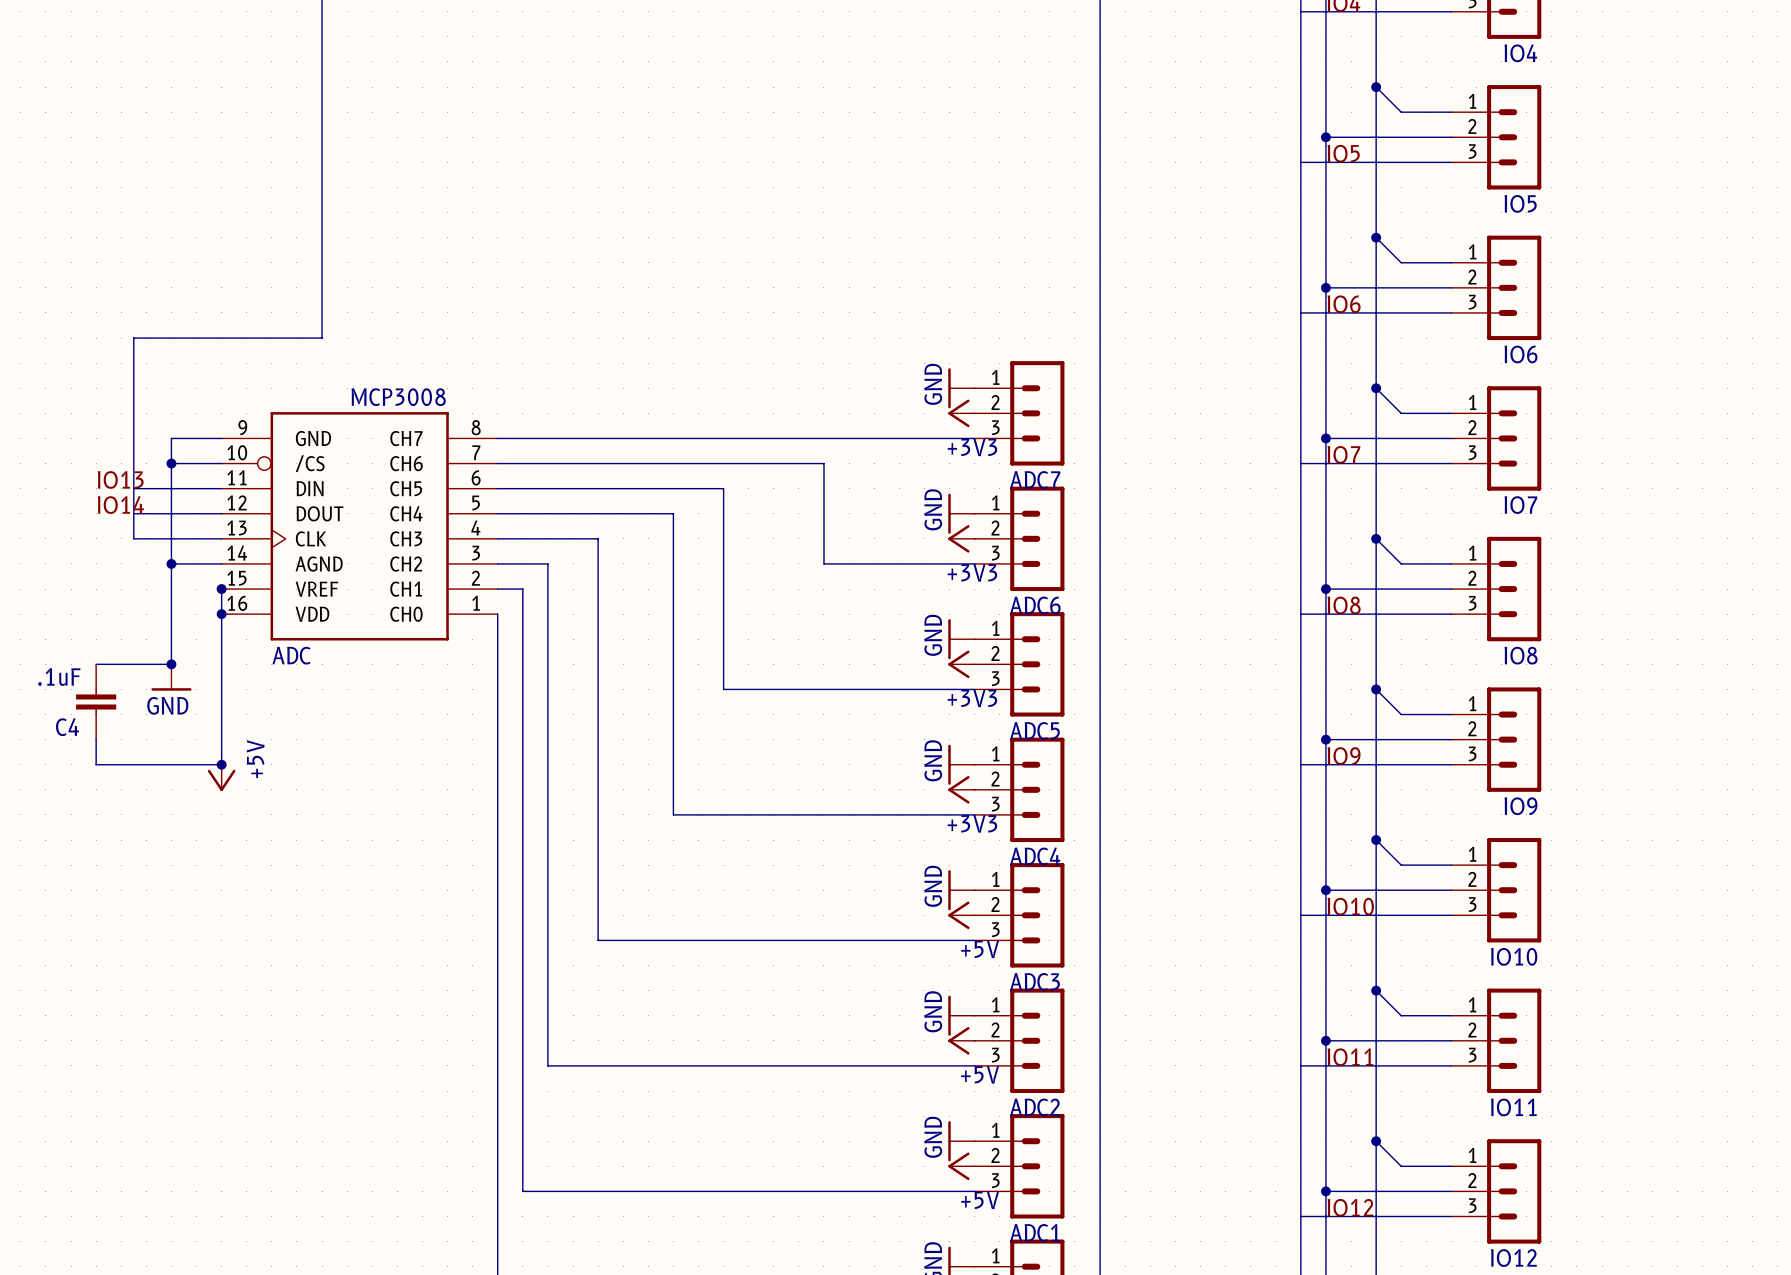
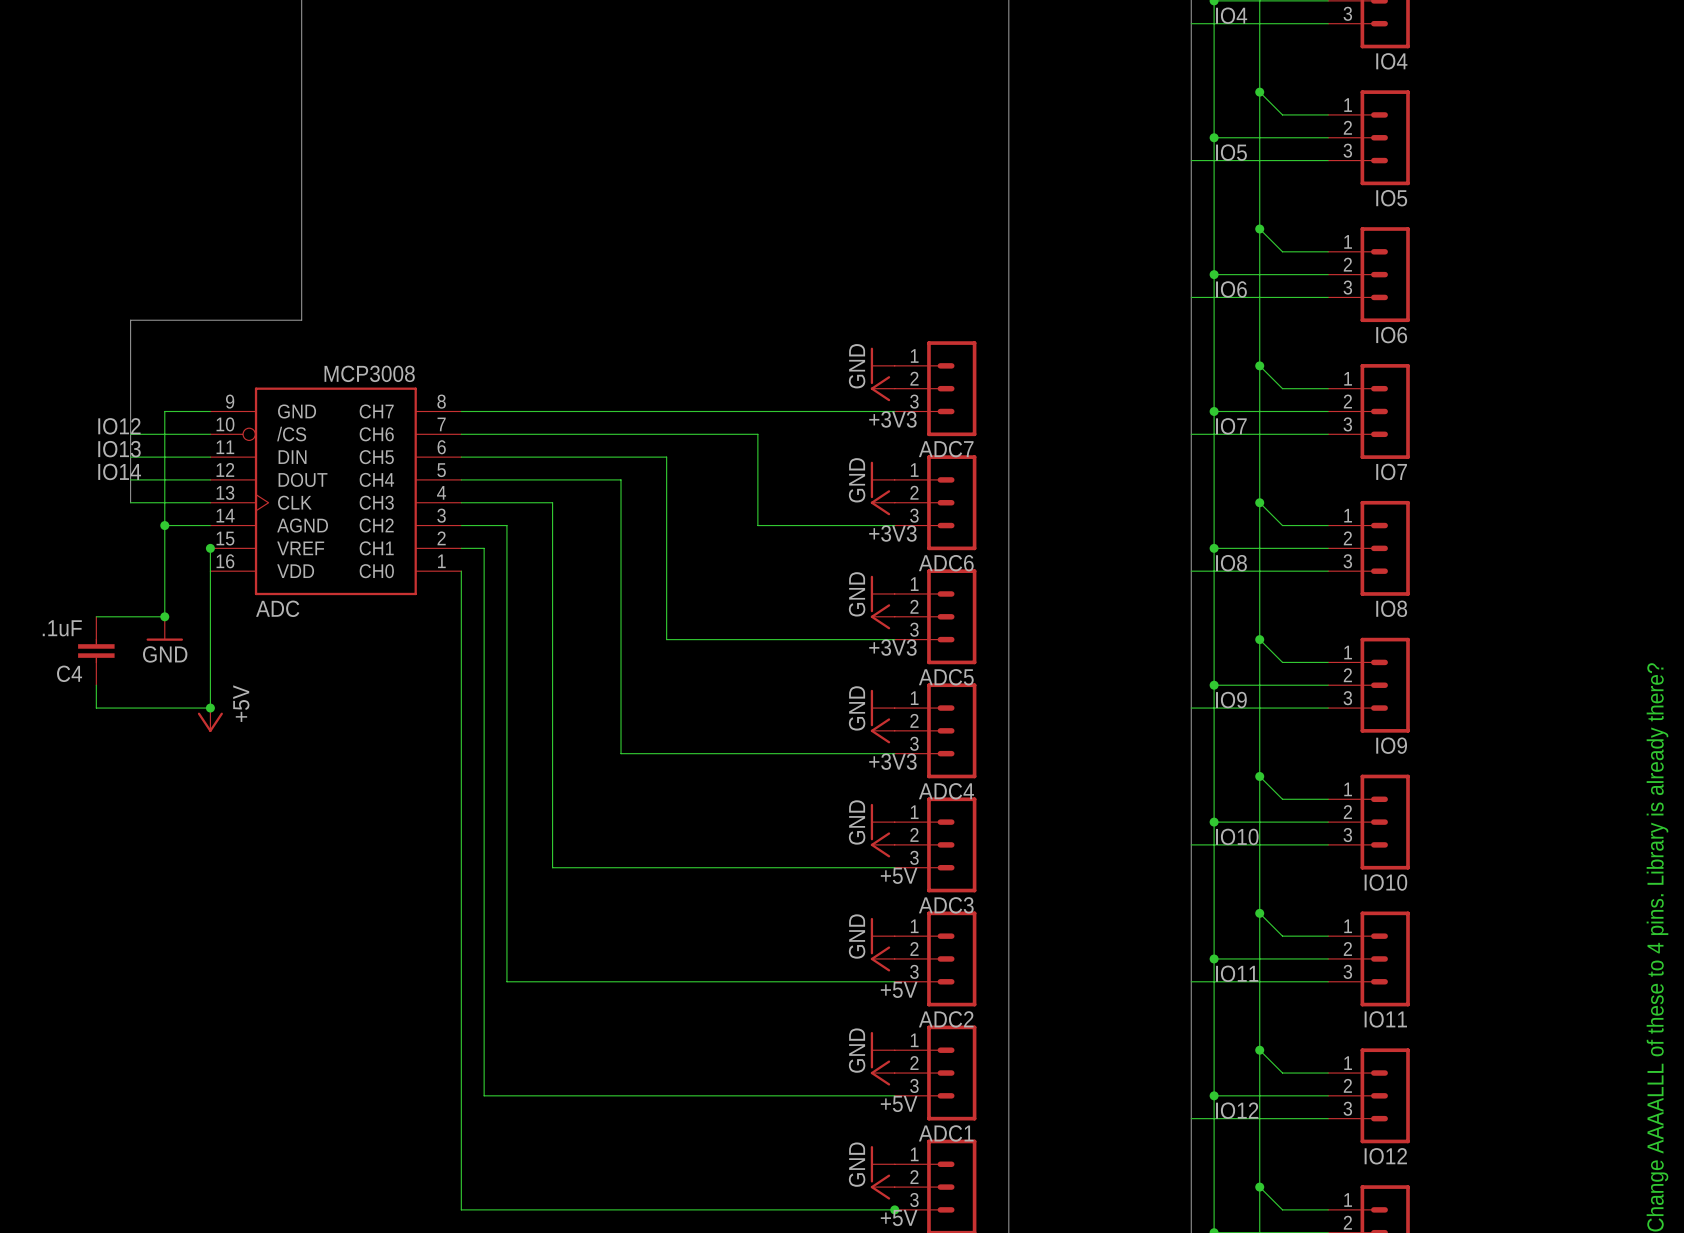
label: none -> IO12 (119, 426)
wire: none -> (130, 434) (164, 434)
junction: (171, 463) -> none
junction: (221, 614) -> none

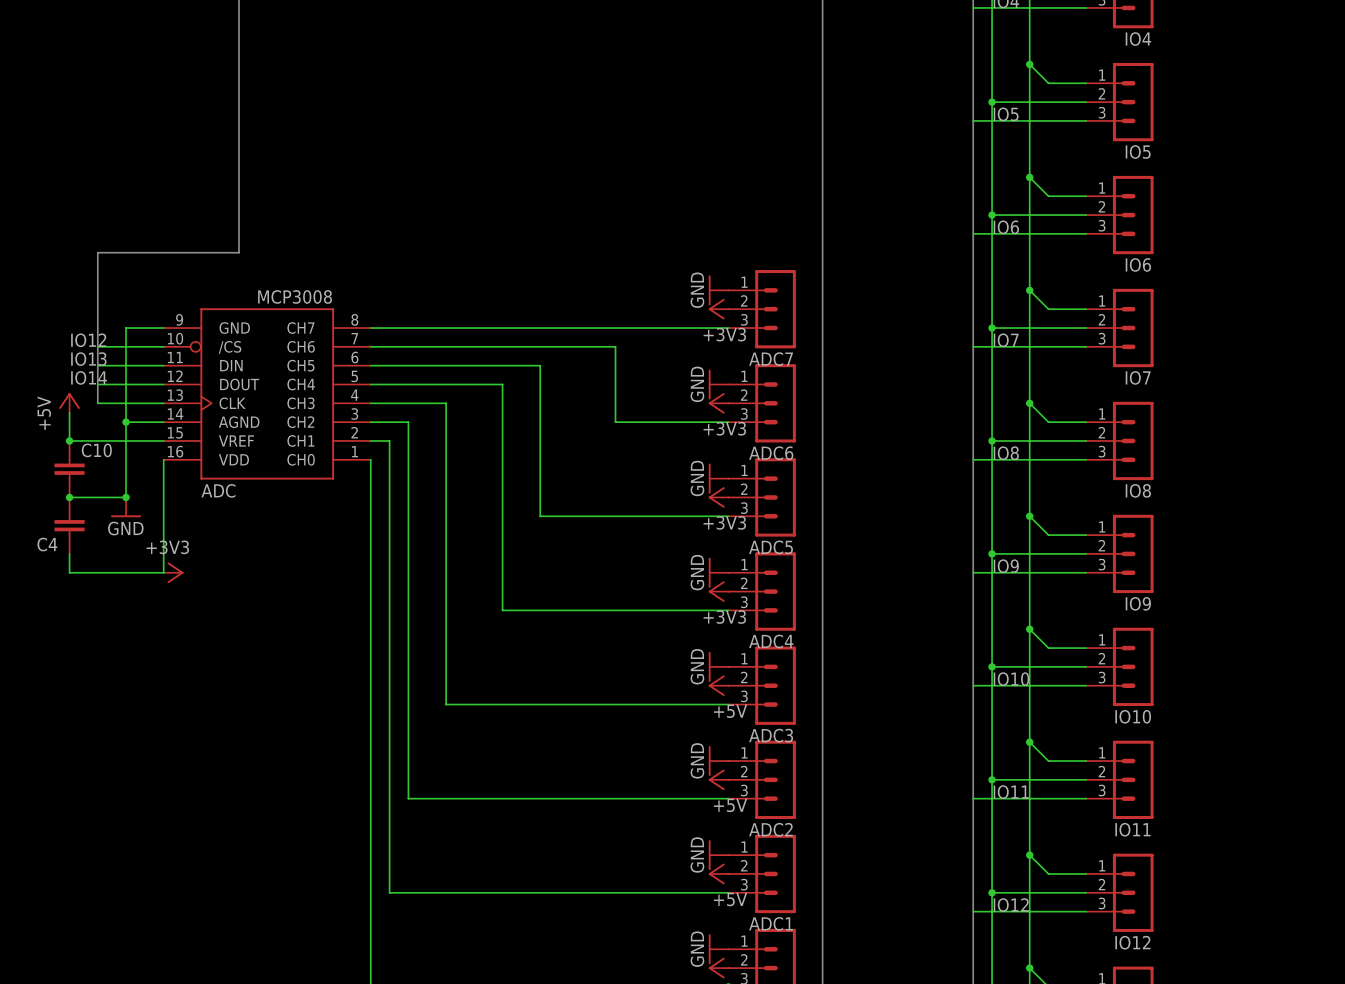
power symbol: none -> +5V (69, 402)
junction: none -> (69, 440)
wire: (210, 548) (210, 571) -> (163, 440) (69, 440) (69, 412)
junction: (210, 548) -> none
C10: none -> (69, 469)
junction: none -> (69, 497)
C4 value: .1uF (62, 628) -> none
junction: (210, 708) -> none
power symbol: none -> +3V3 (173, 572)
power symbol: +5V (210, 720) -> none

